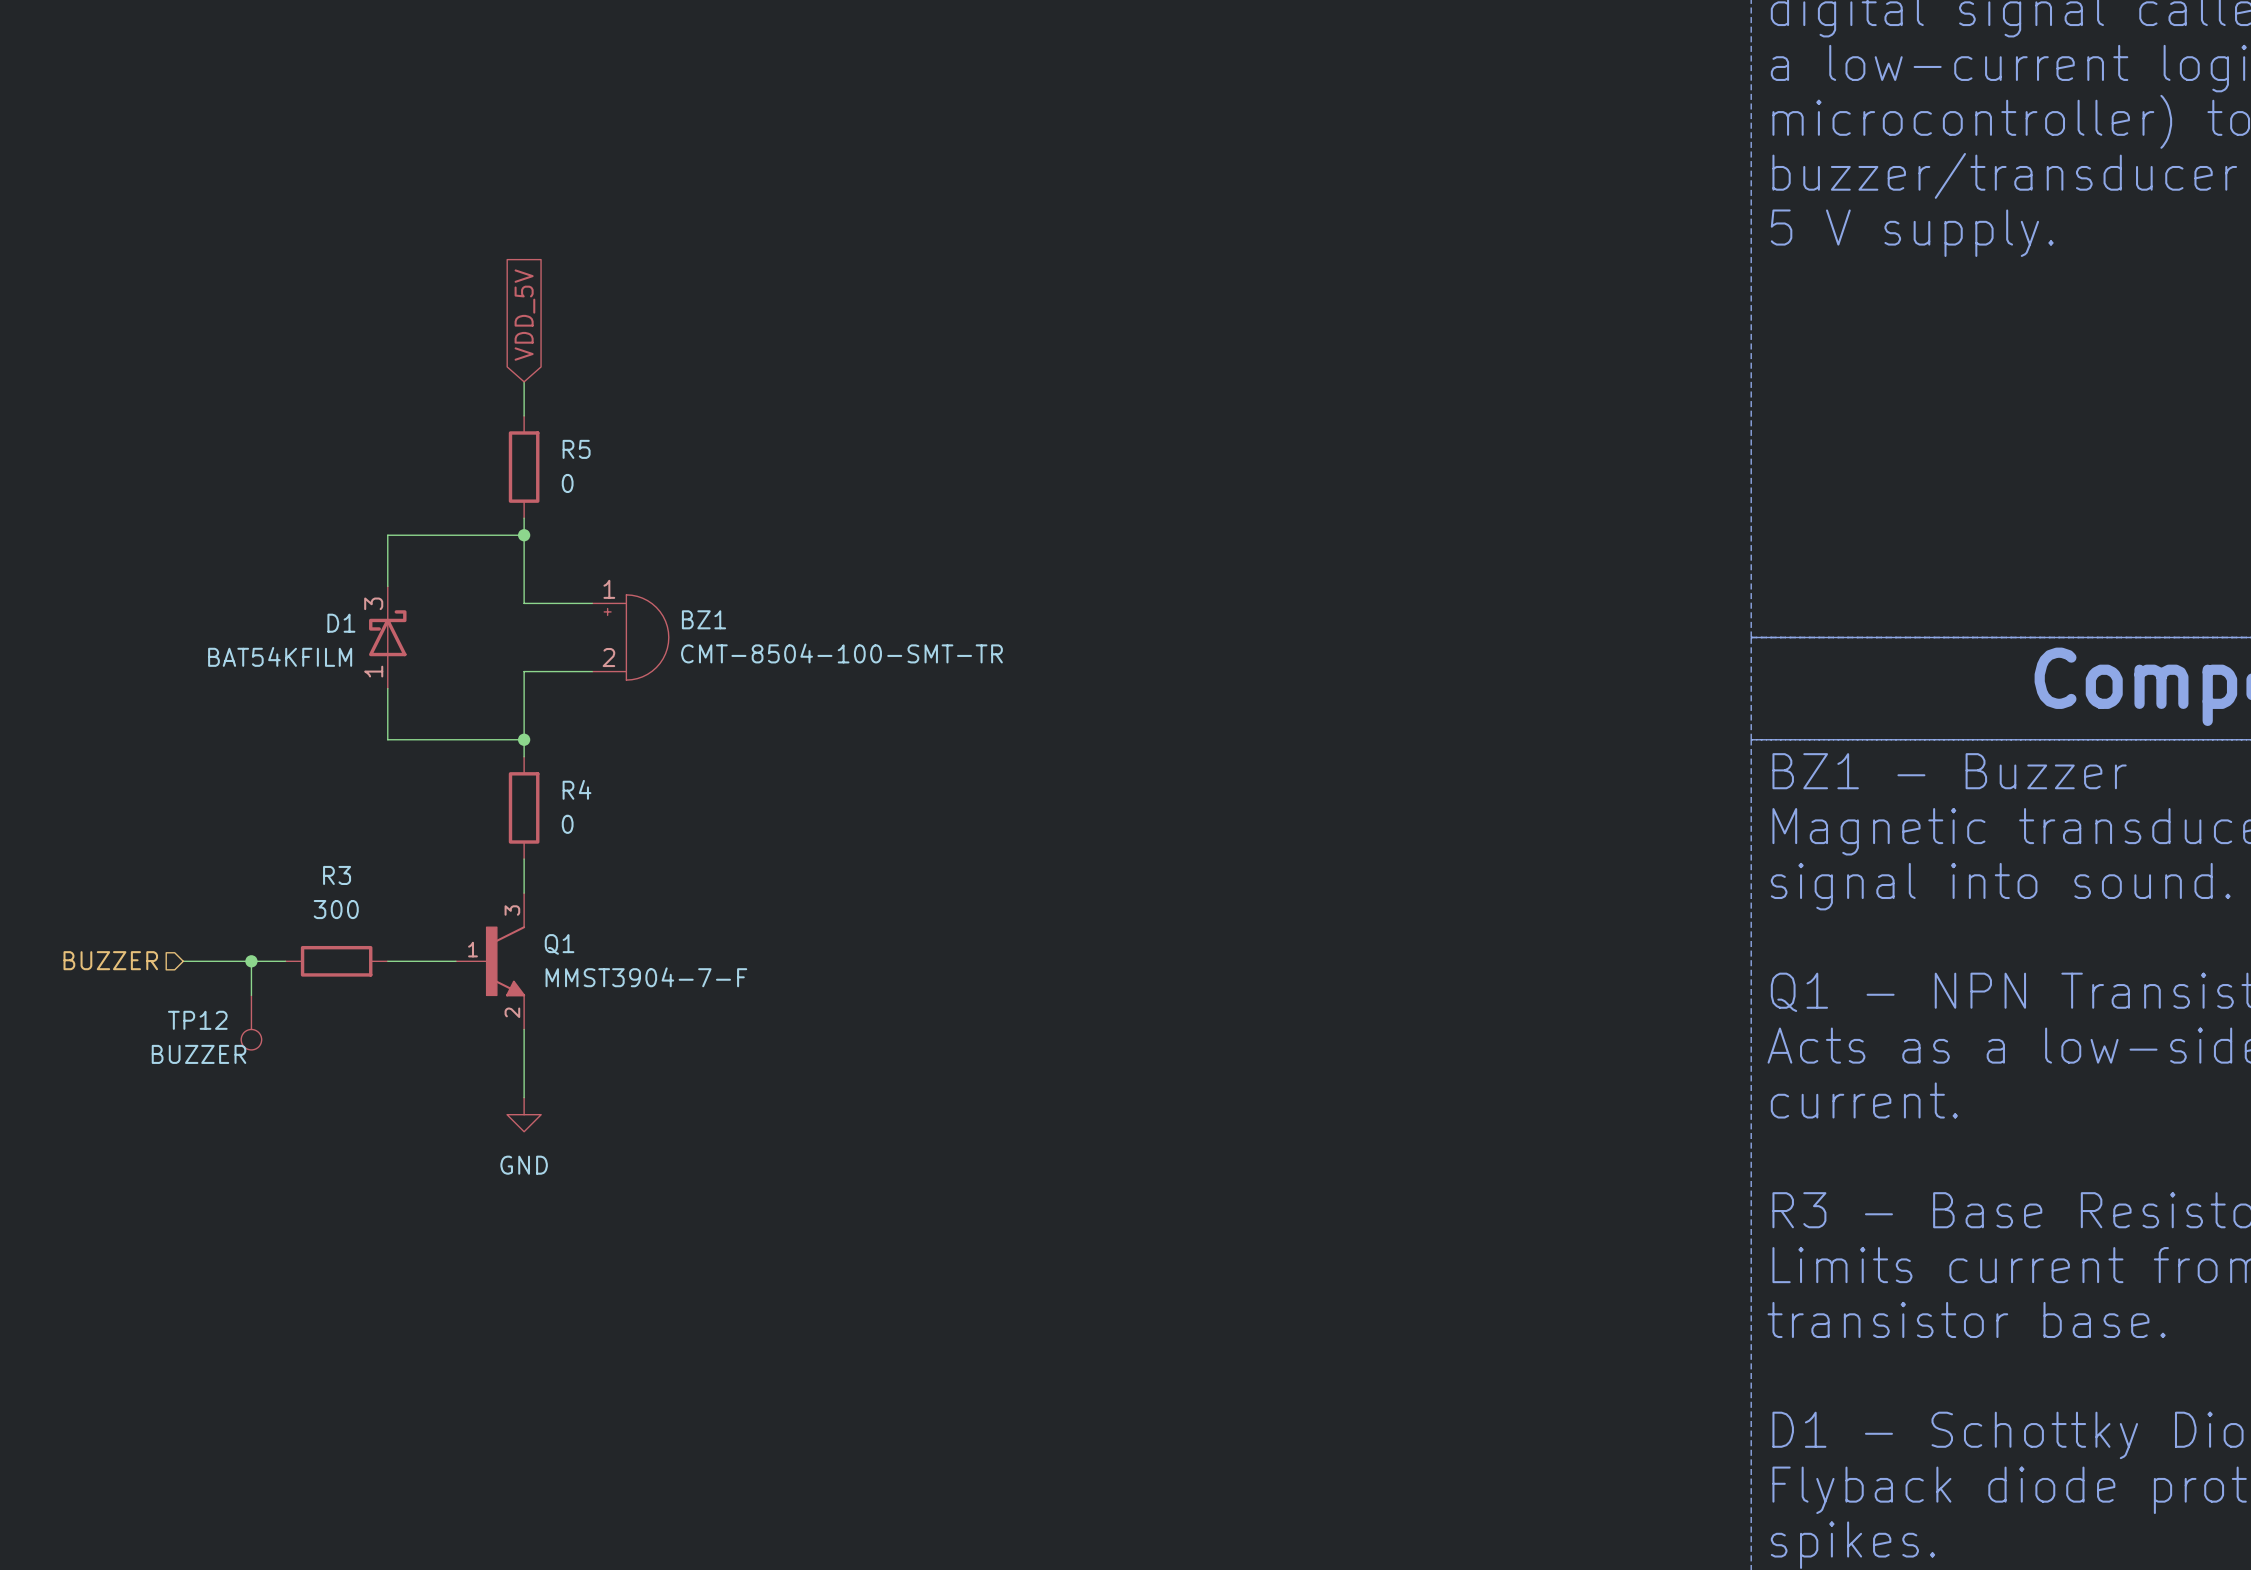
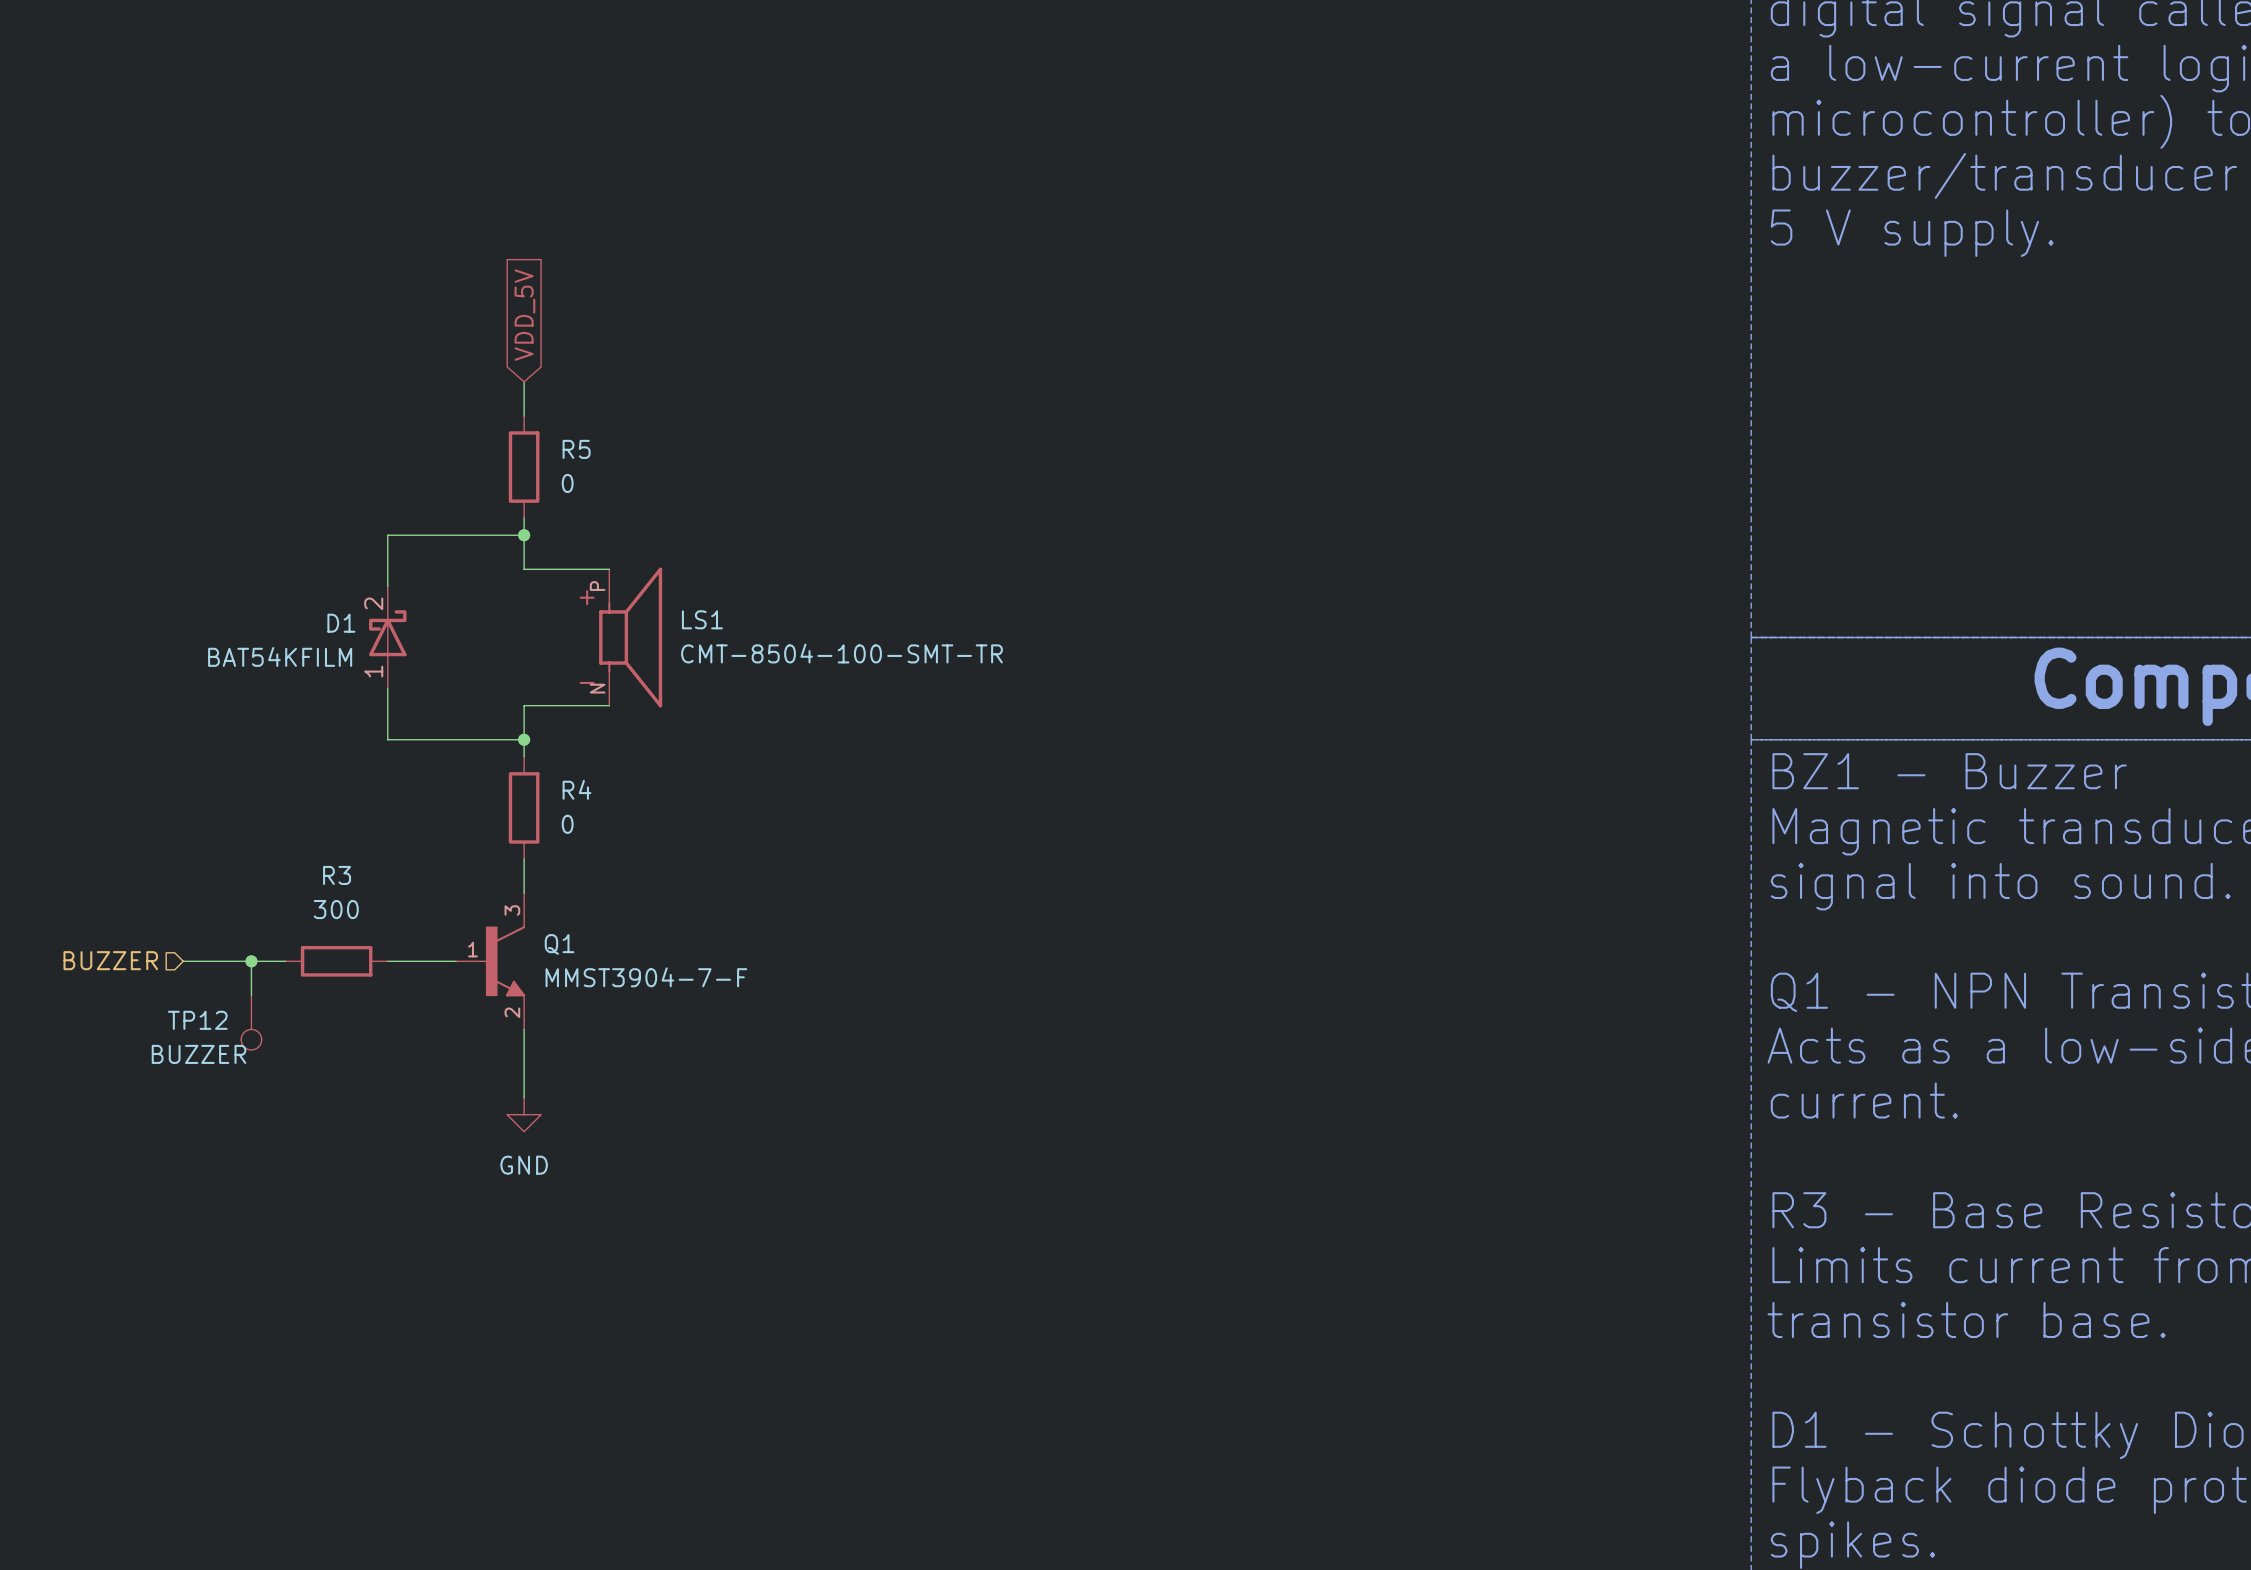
wire: (524, 569) (524, 603) (592, 603) -> (524, 569) (609, 569)
D1 pin number: 3 (373, 603) -> 2 (373, 603)
BZ1: CMT-8504-100-SMT-TR (630, 637) -> none
LS1: none -> CMT-8504-100-SMT-TR (630, 637)
wire: (592, 671) (524, 671) (524, 705) -> (609, 705) (524, 705)

